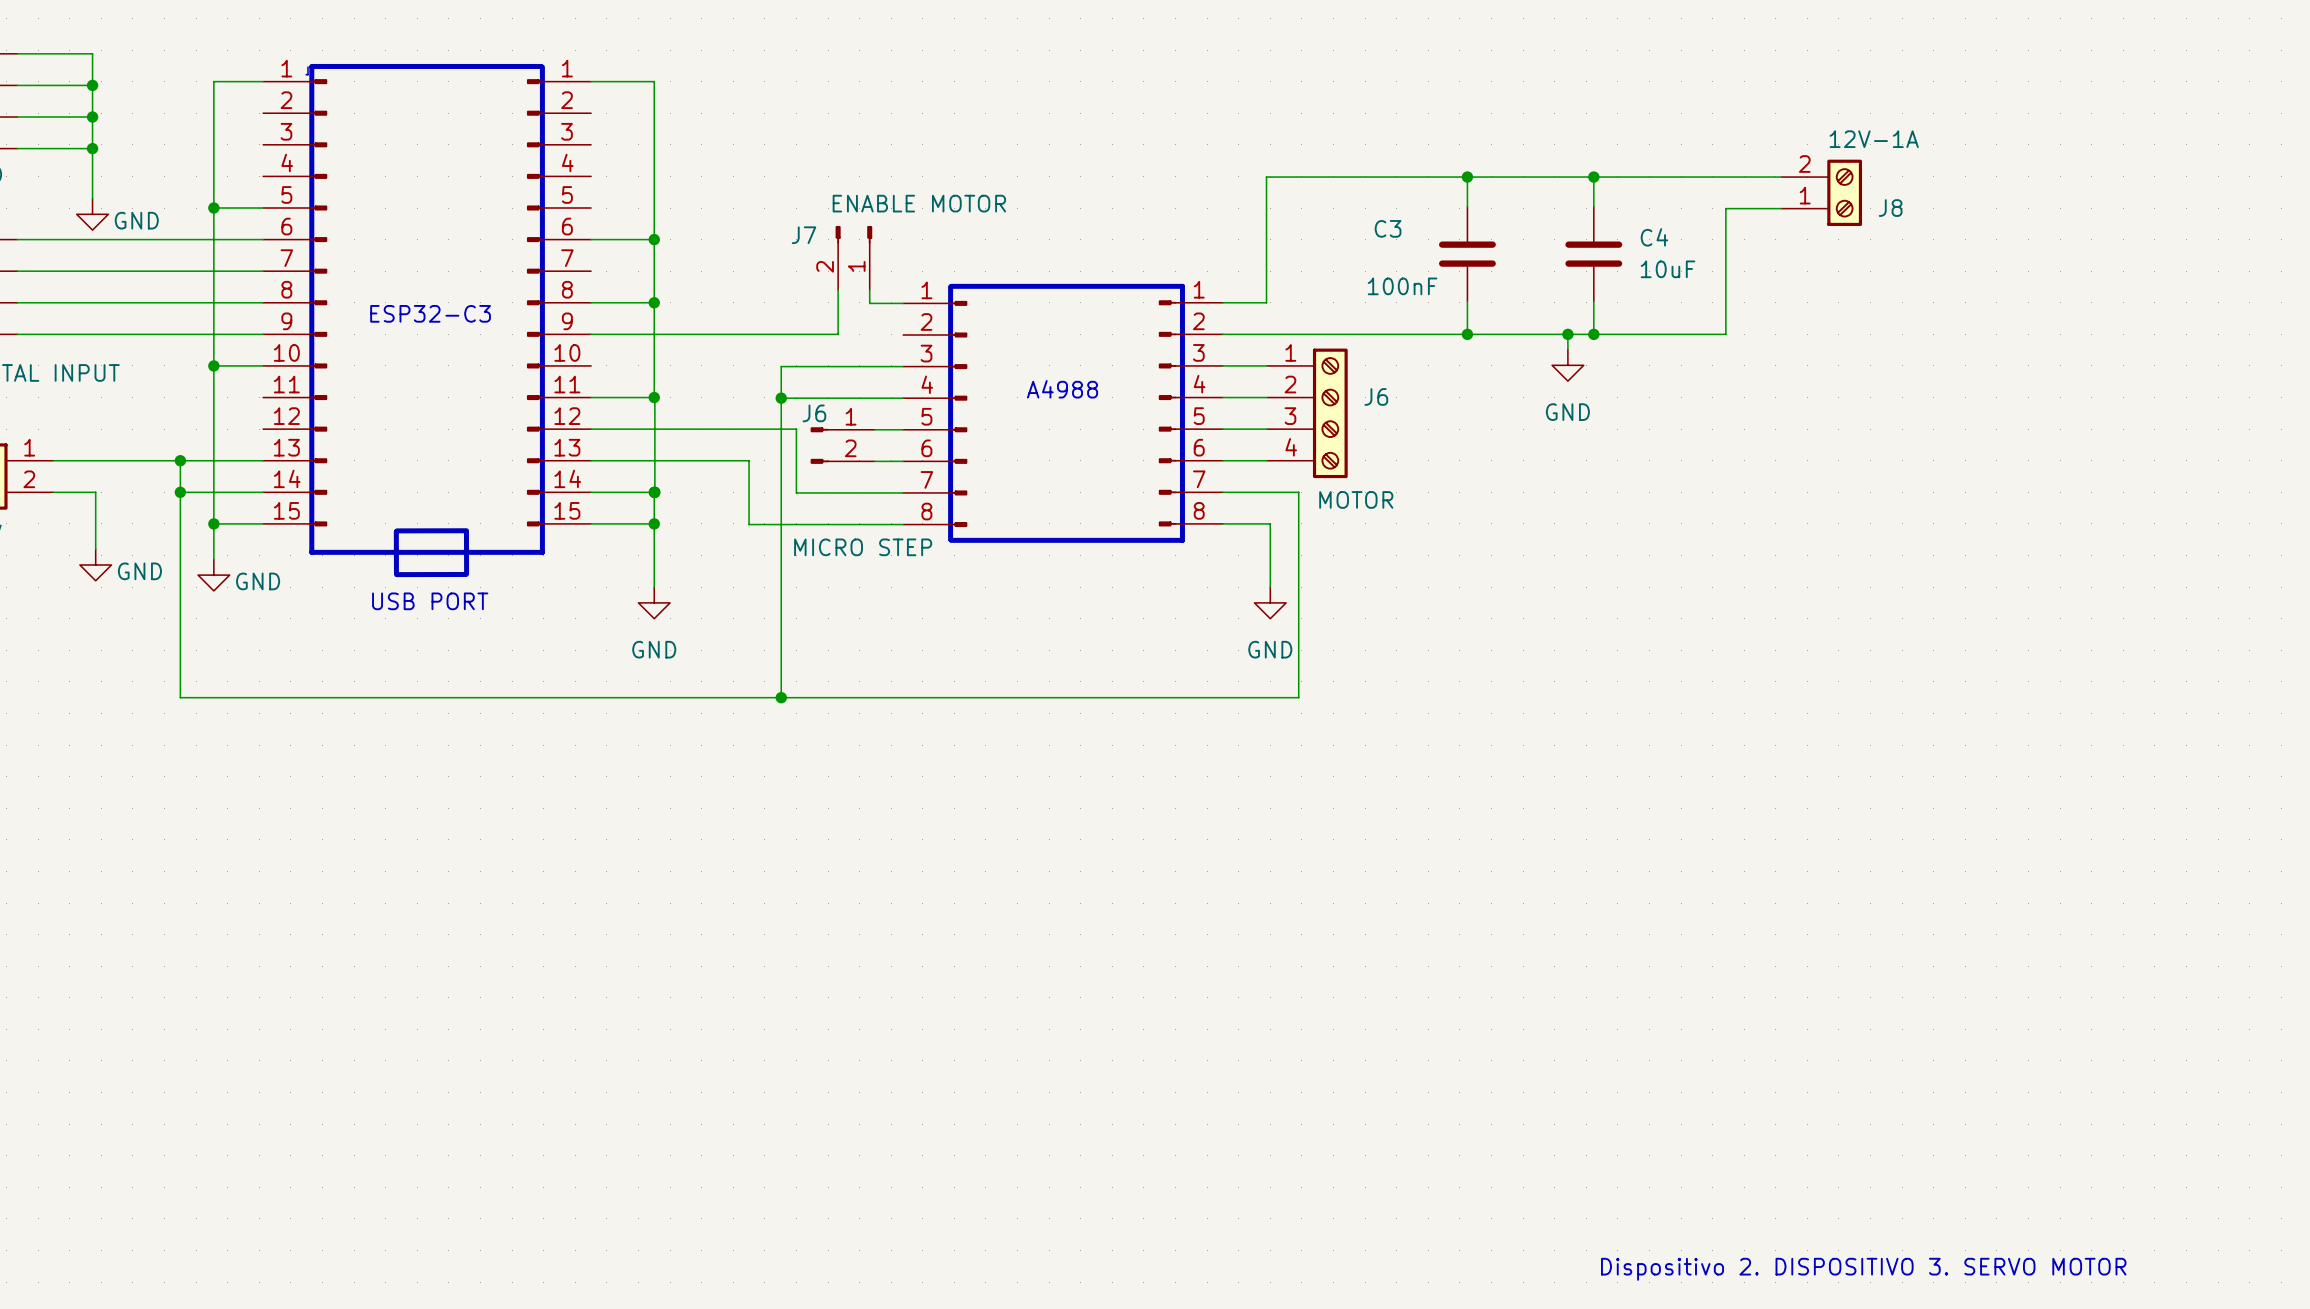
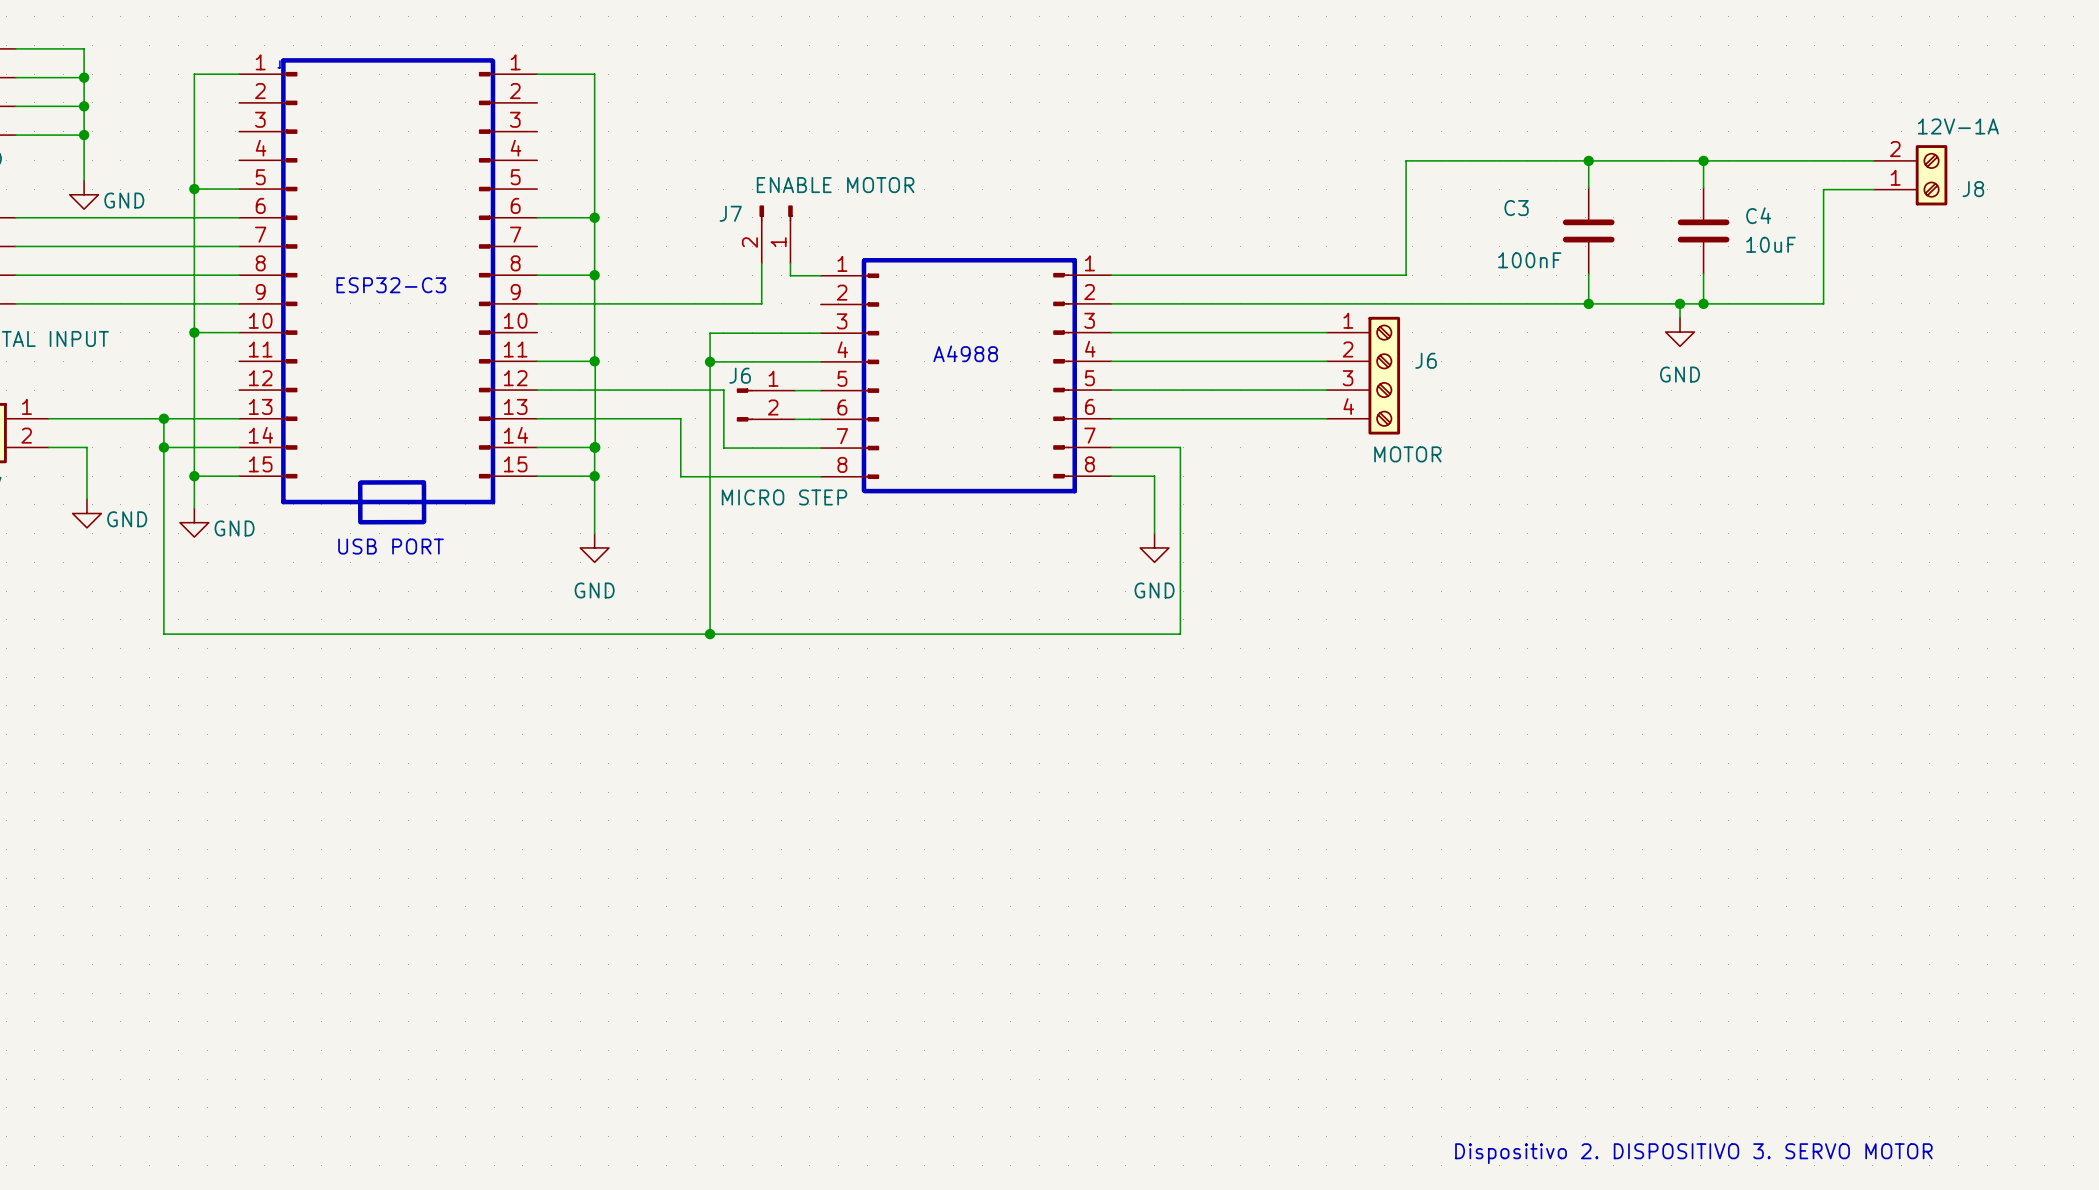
wire: (1467, 177) (1467, 206) -> (1588, 160) (1588, 187)
junction: (1467, 177) -> none
wire: (1547, 177) (1266, 177) (1266, 302) -> (1406, 160) (1406, 275) (1151, 275)
wire: (1593, 177) (1593, 206) -> (1703, 160) (1703, 187)
junction: (1593, 177) -> none
junction: none -> (1588, 160)
wire: none -> (1619, 160) (1874, 160)
junction: none -> (1703, 160)
J8 position: (1821, 192) -> (1910, 175)
wire: (1781, 208) (1725, 208) (1725, 334) -> (1874, 189) (1823, 189) (1823, 303) (1568, 303)
C3 position: (1467, 254) -> (1588, 230)
C4 position: (1593, 254) -> (1703, 230)
wire: (1467, 301) (1467, 334) -> (1588, 274) (1588, 303)
wire: (1593, 301) (1593, 334) -> (1703, 274) (1703, 303)
junction: (1467, 334) -> none
wire: (1567, 334) (1567, 349) -> (1680, 303) (1680, 317)
junction: (1567, 334) -> none
junction: (1593, 334) -> none
junction: none -> (1588, 303)
junction: none -> (1680, 303)
junction: none -> (1703, 303)
wire: none -> (1151, 332) (1326, 332)
power symbol position: GND (1567, 365) -> GND (1680, 332)
wire: none -> (1151, 361) (1326, 361)
J6 position: (1307, 413) -> (1363, 375)
wire: none -> (1151, 390) (1326, 390)
wire: none -> (1151, 418) (1326, 418)

